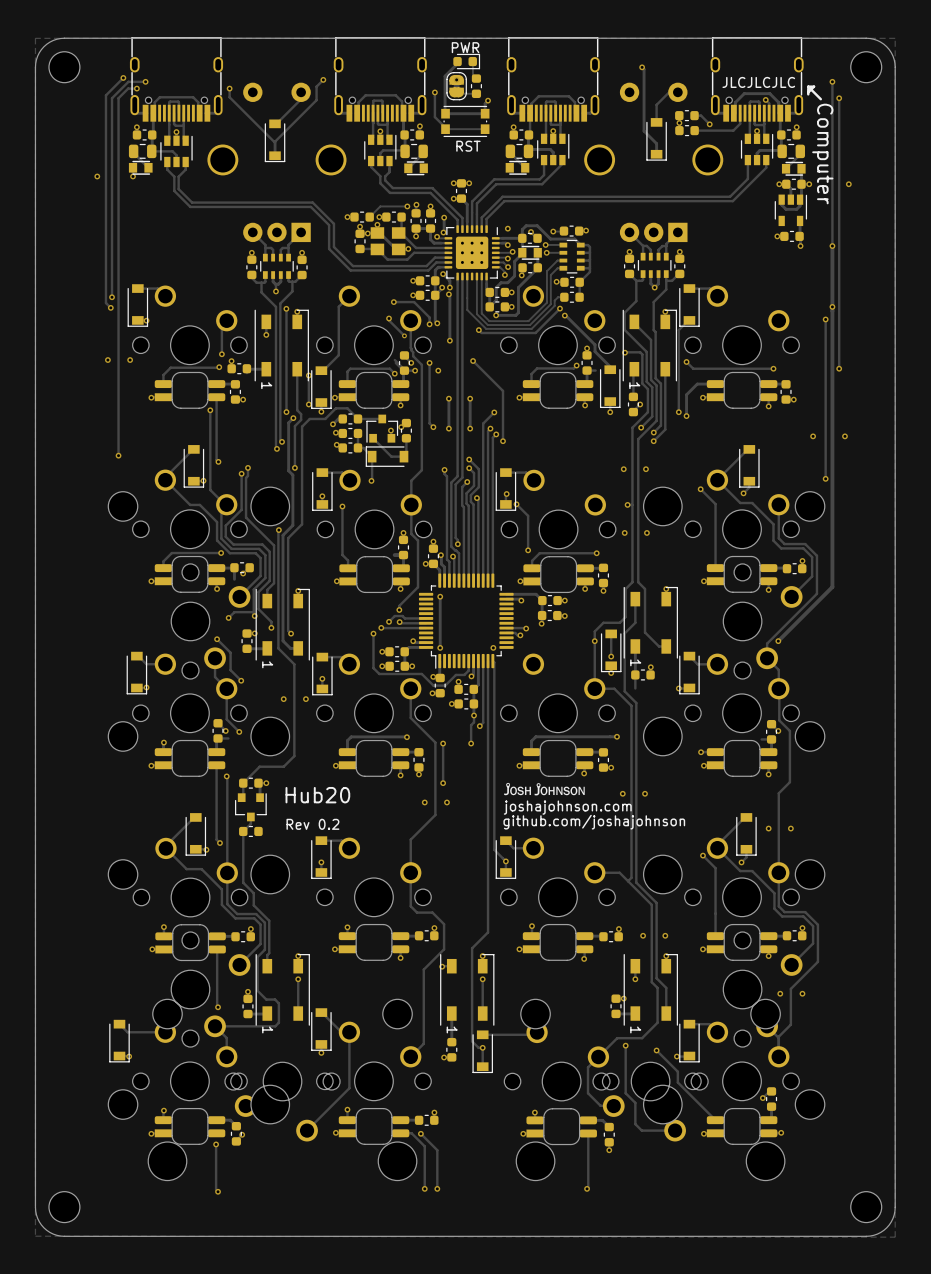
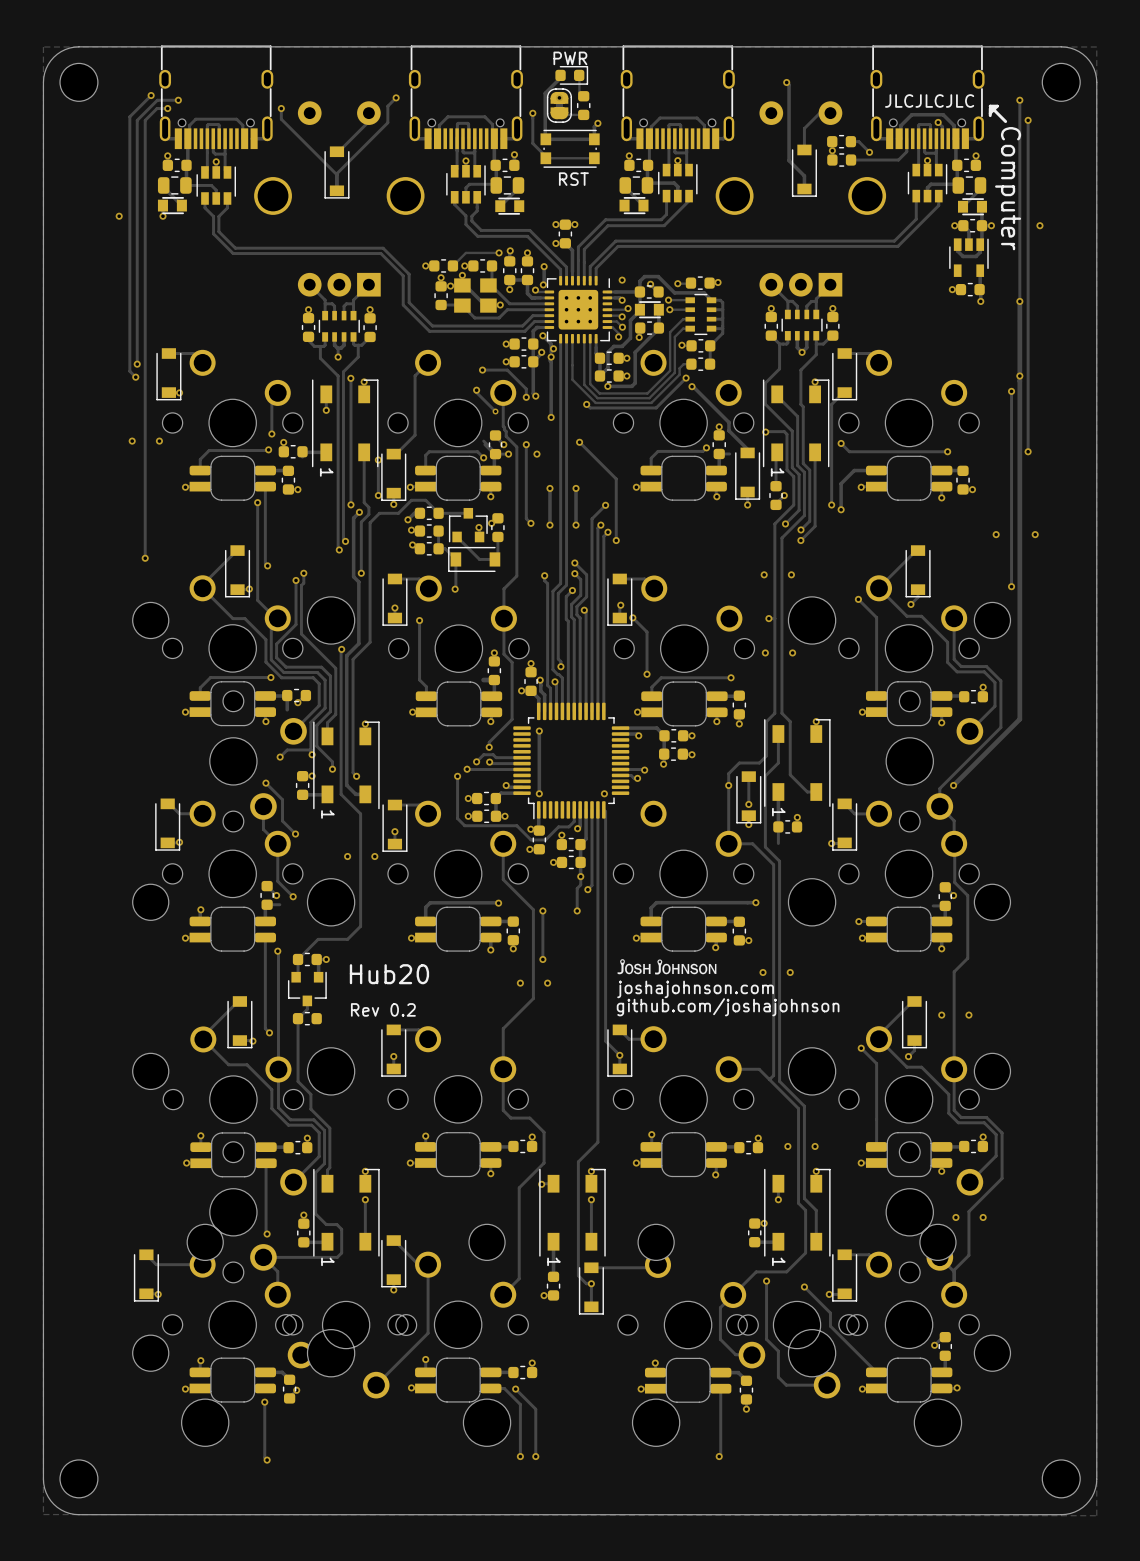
via: none -> (553, 348)
via: (449, 287) -> none
via: none -> (551, 357)
via: (448, 294) -> none

